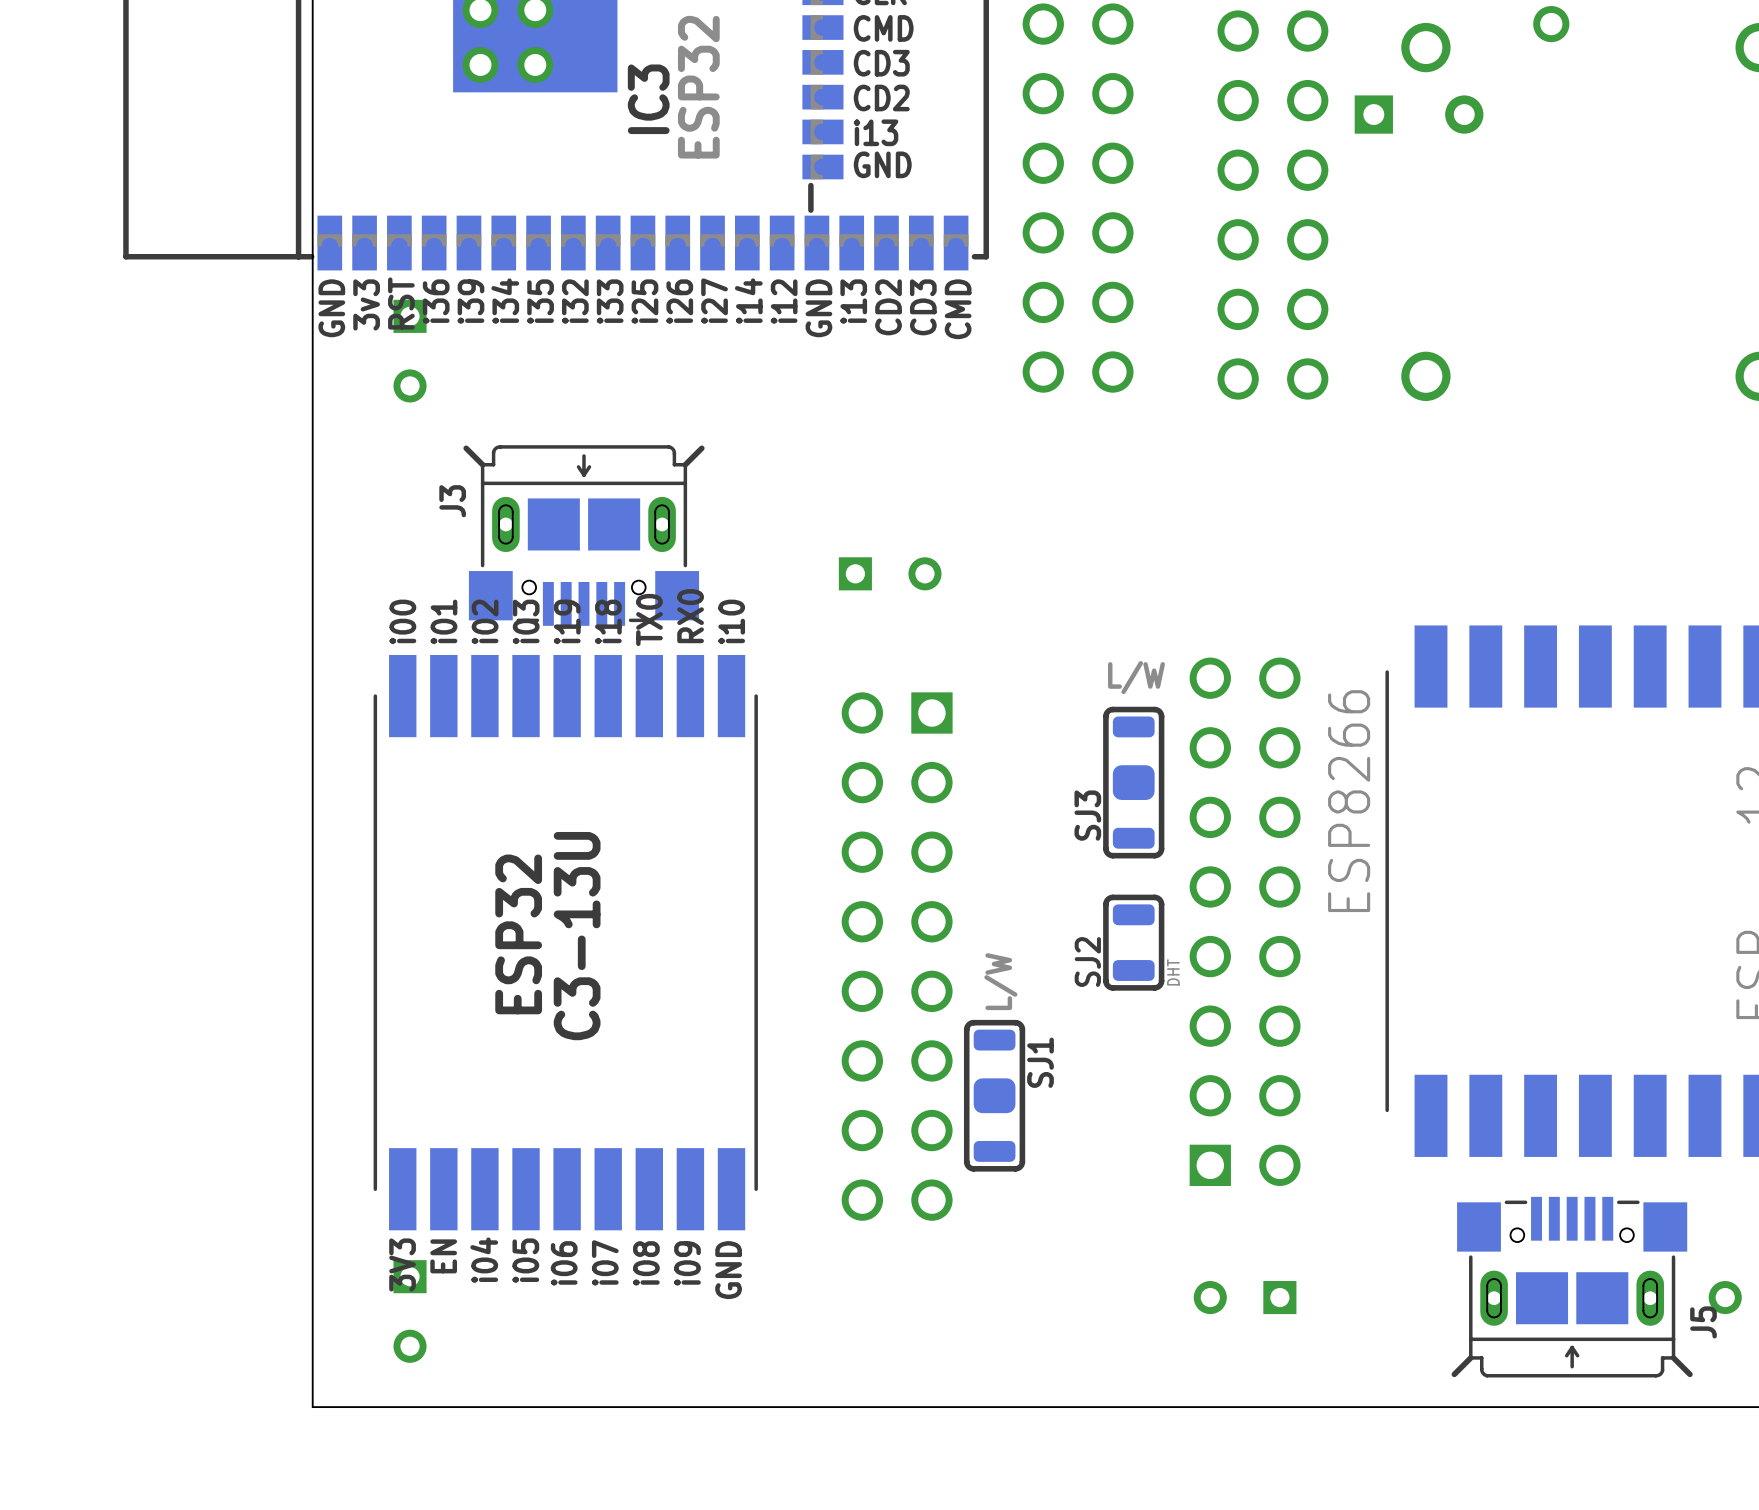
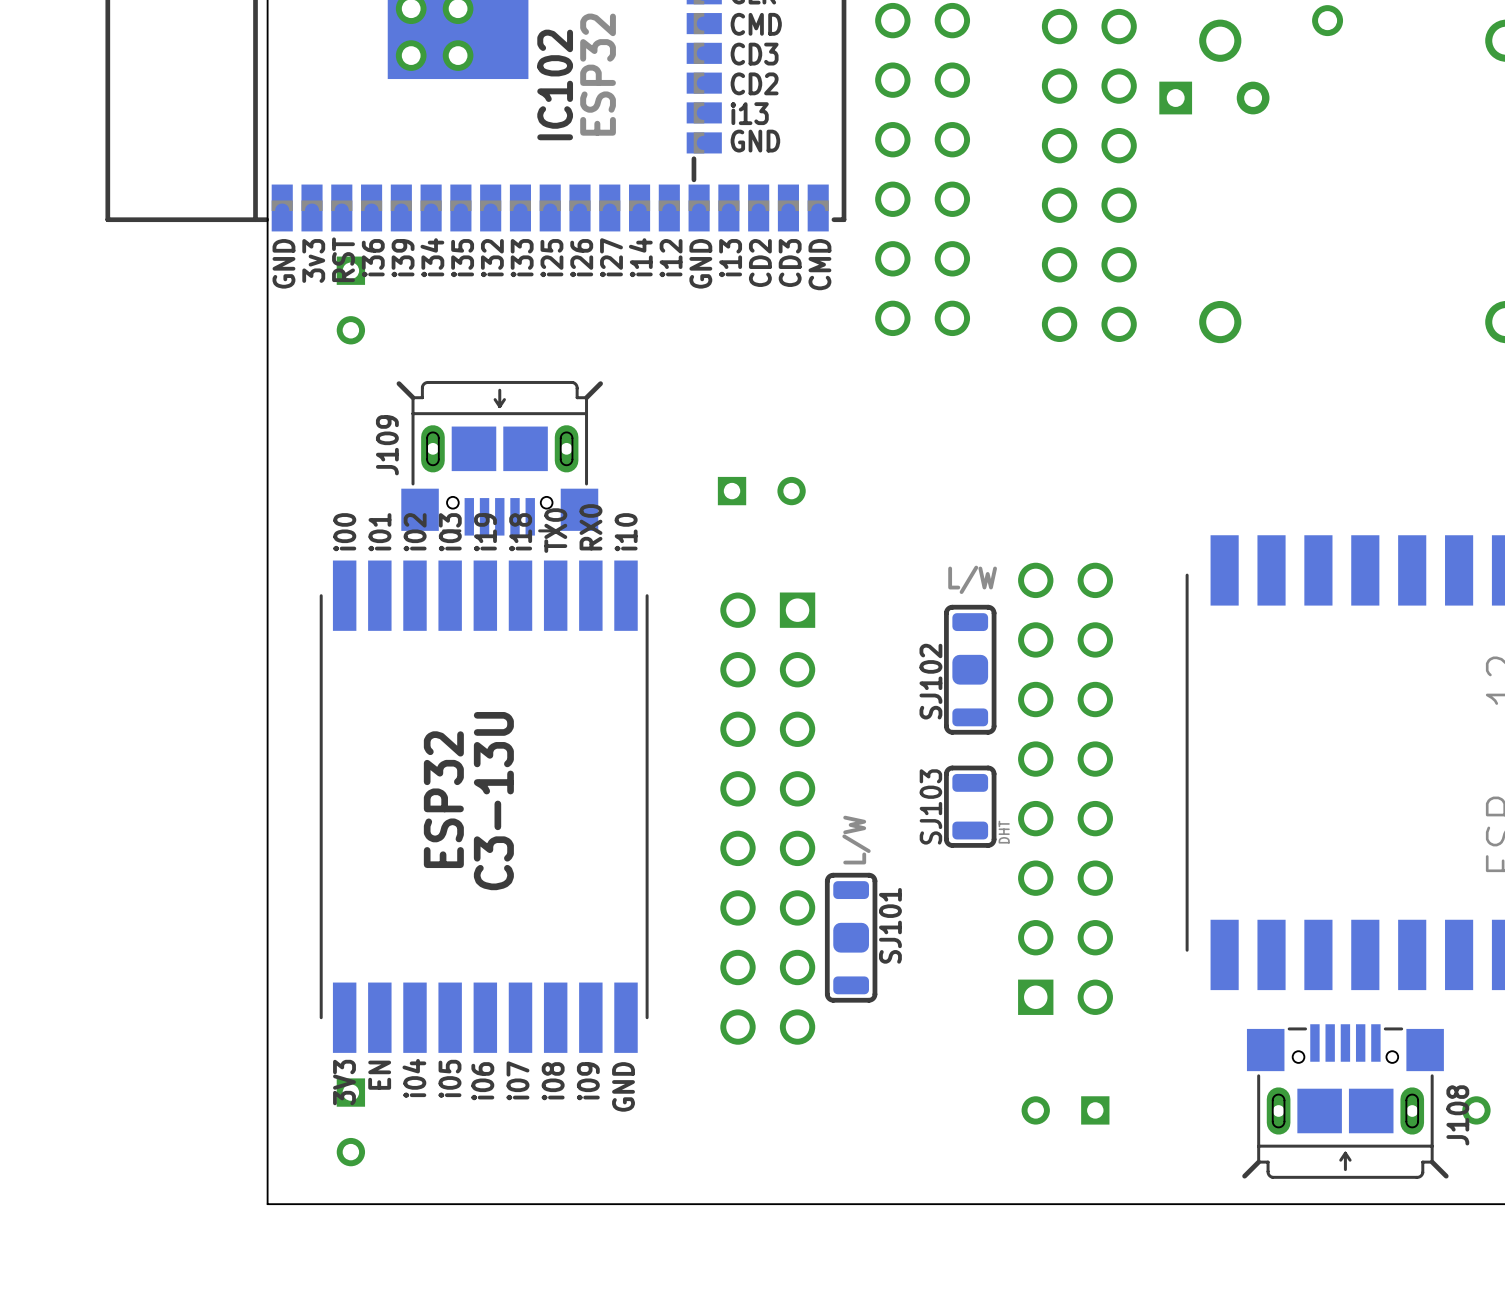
IC3 name: IC3 (648, 99) -> IC102 (555, 84)
J3 name: J3 (452, 501) -> J109 (387, 445)
part value: ESP8266 (1349, 801) -> none
SJ3 name: SJ3 (1087, 815) -> SJ102 (930, 681)
SJ2 name: SJ2 (1087, 962) -> SJ103 (930, 806)
SJ1 name: SJ1 (1040, 1062) -> SJ101 (890, 925)
J5 name: J5 (1703, 1322) -> J108 (1457, 1115)

